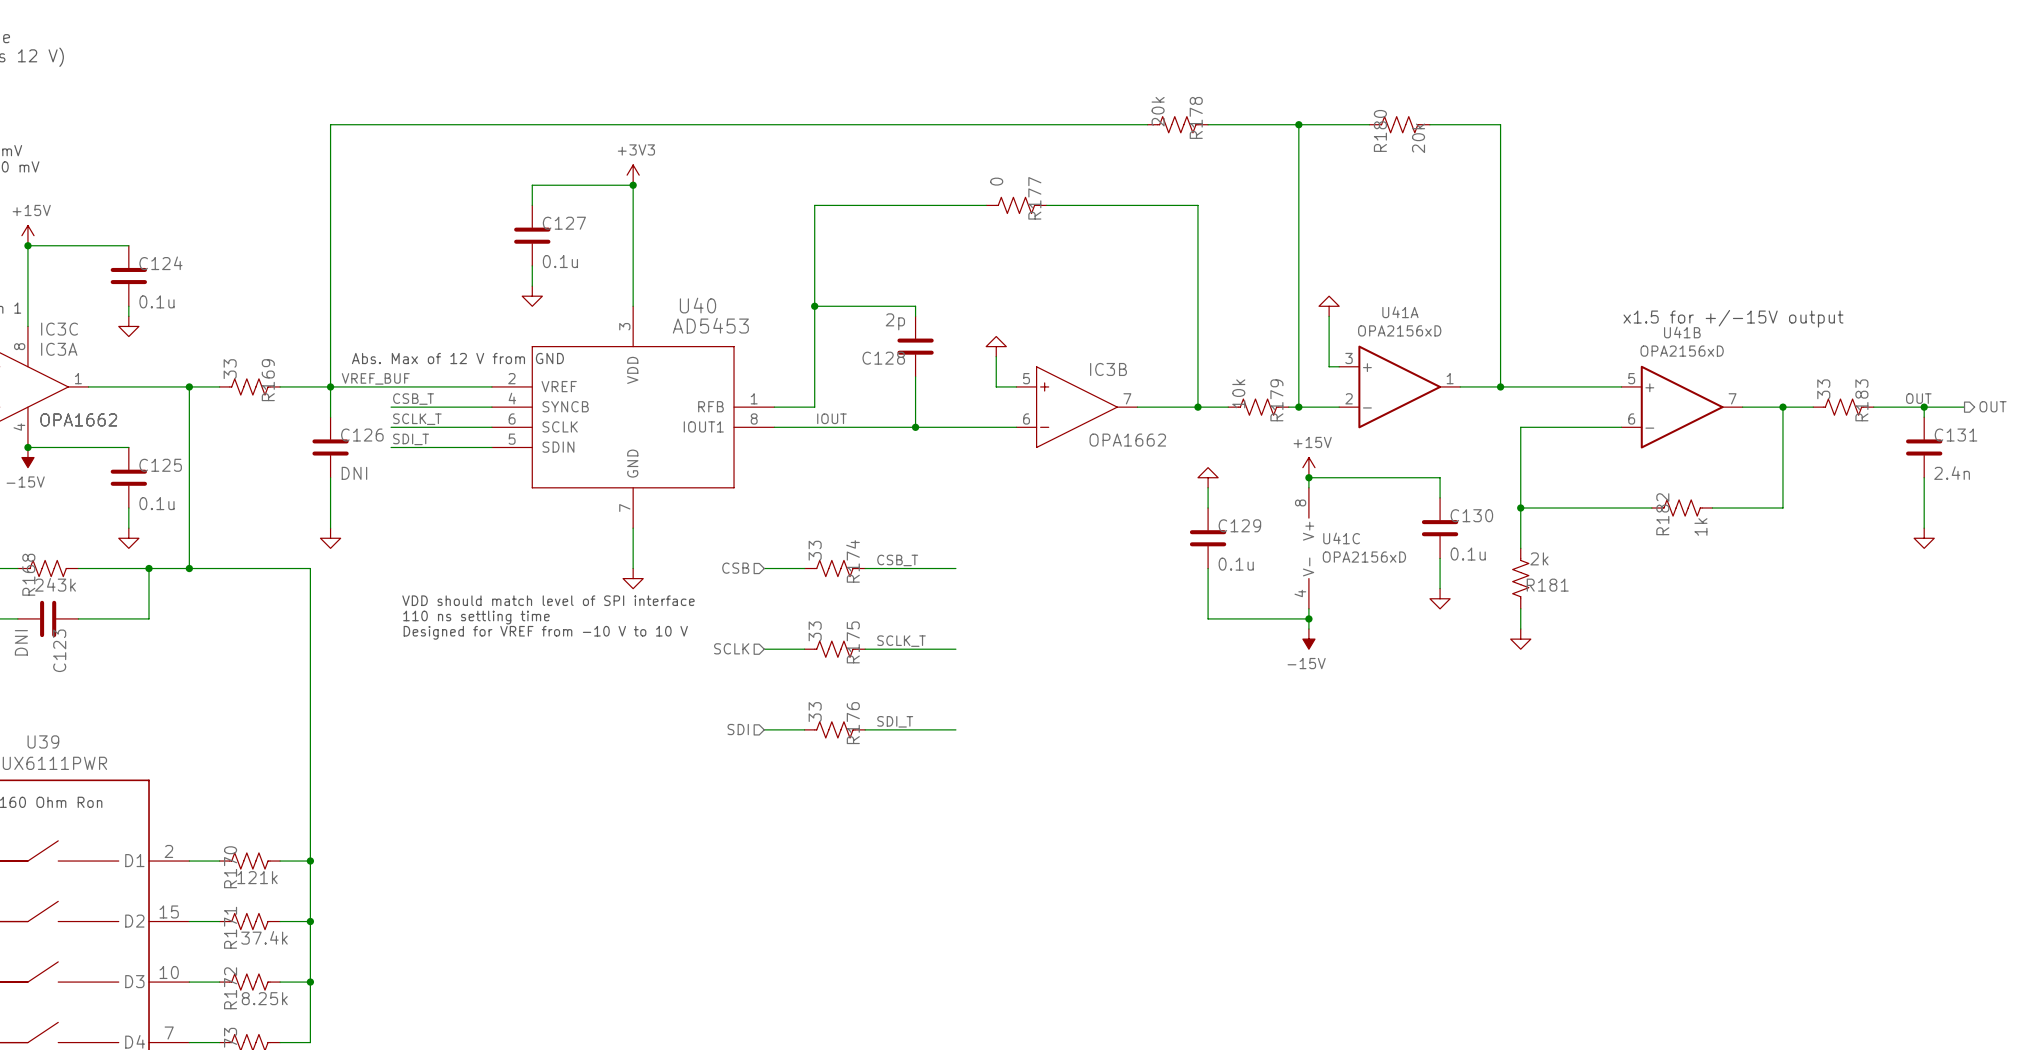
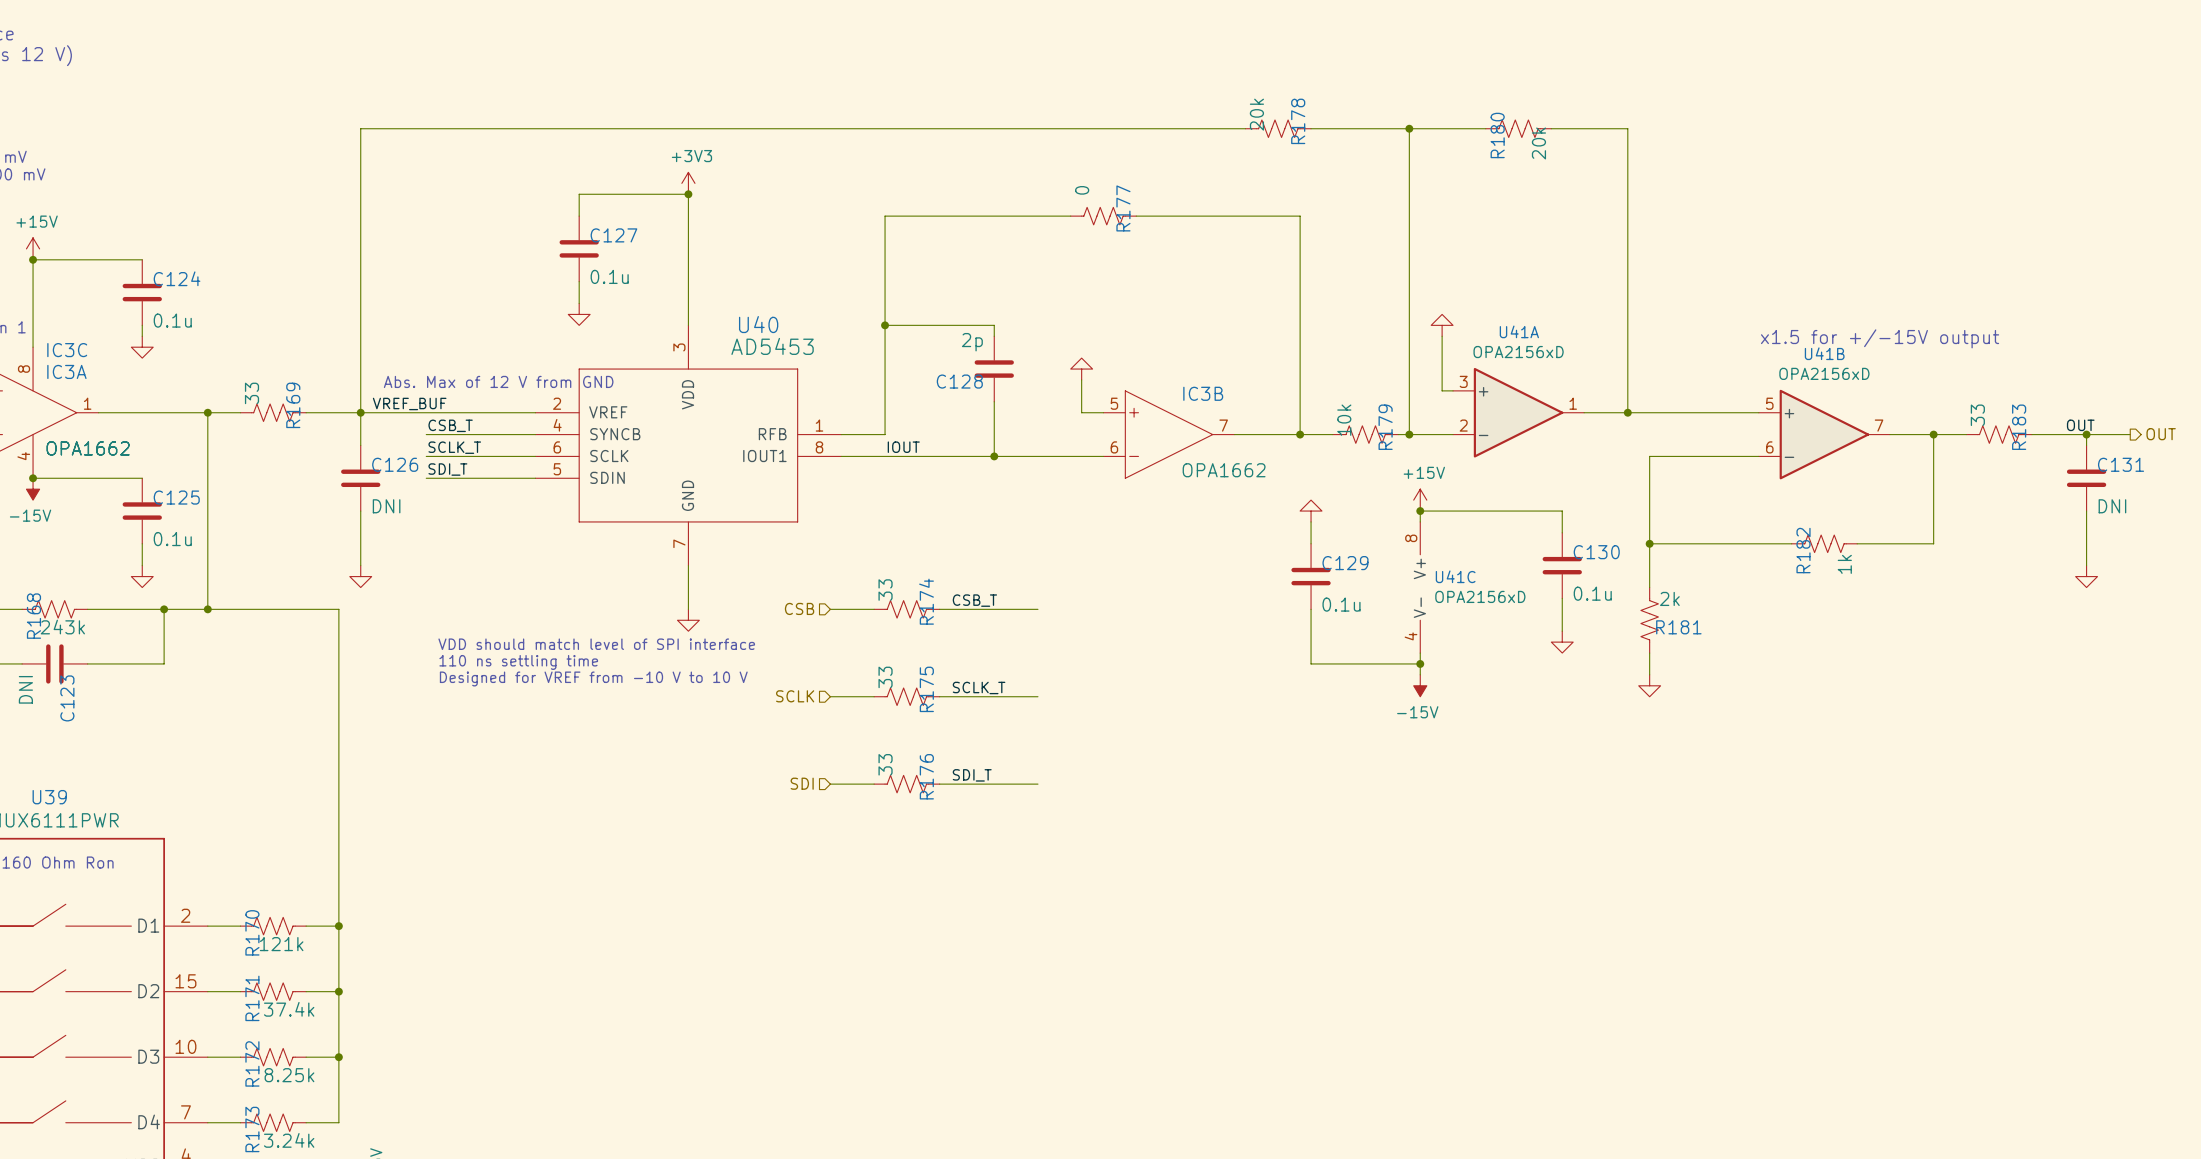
C131 value: 2.4n (1952, 473) -> DNI (2112, 506)

